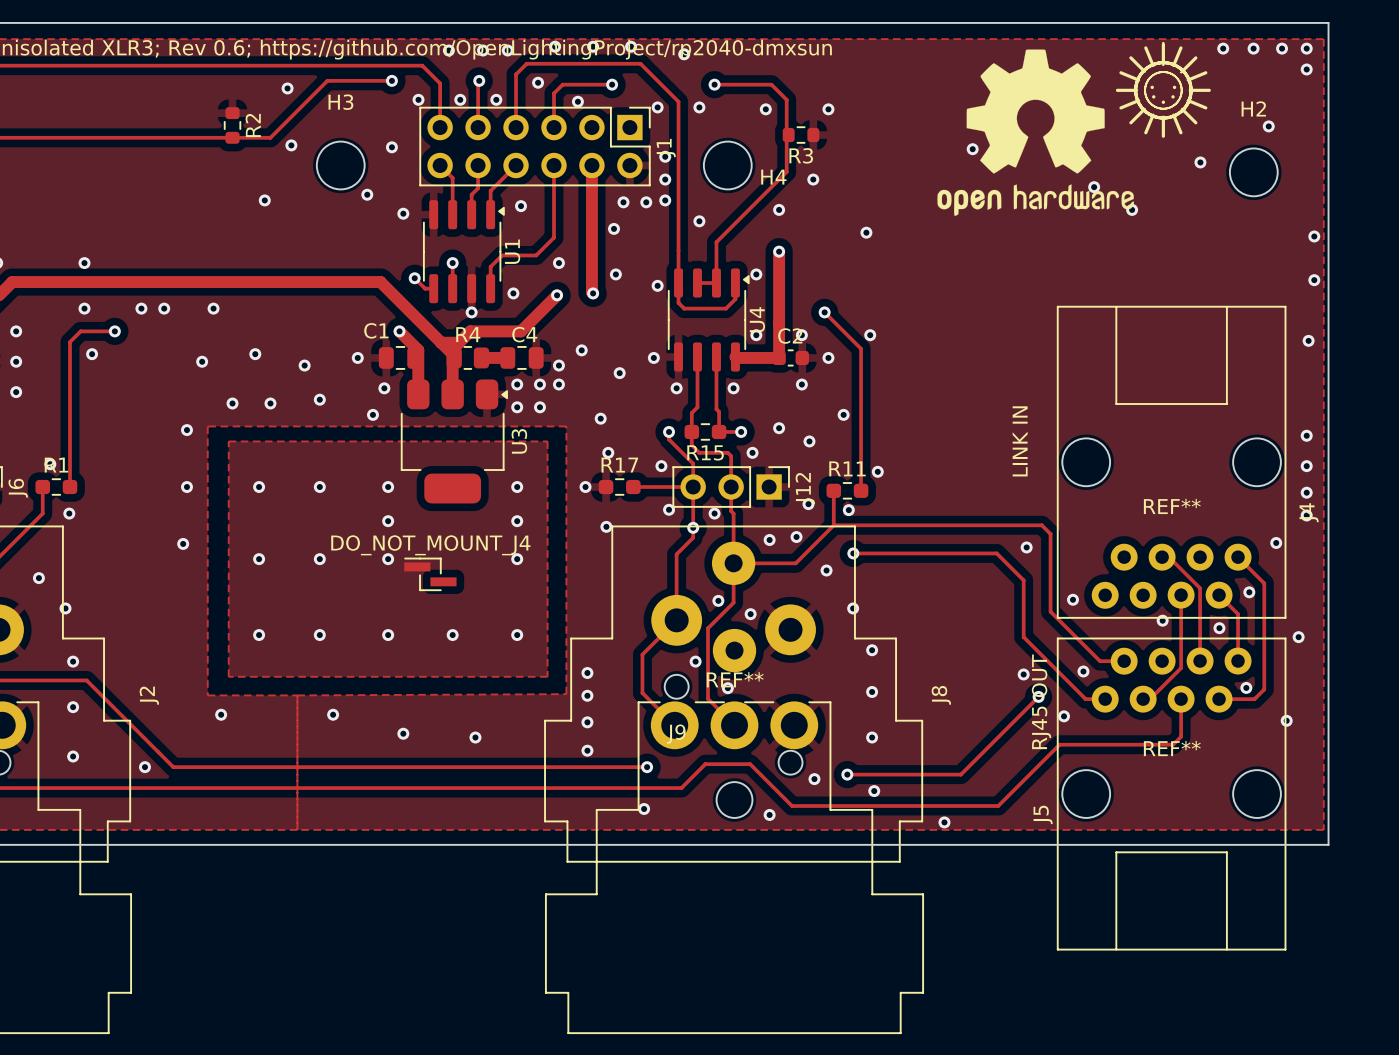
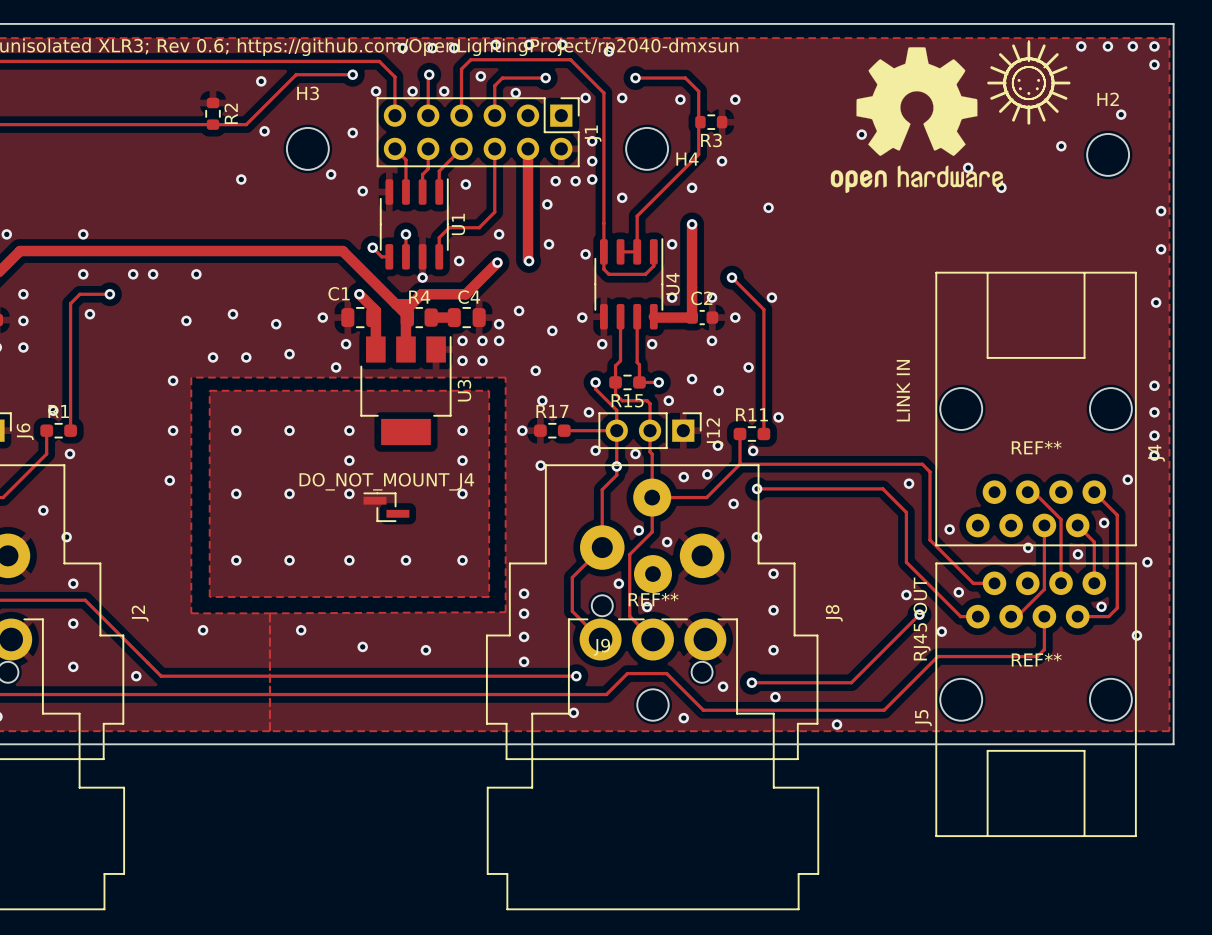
U1 footprint: [423, 200, 505, 304] -> [379, 178, 449, 270]
U4 footprint: [667, 268, 750, 372] -> [594, 238, 664, 330]
U3 footprint: [400, 379, 508, 504] -> [360, 336, 452, 446]

